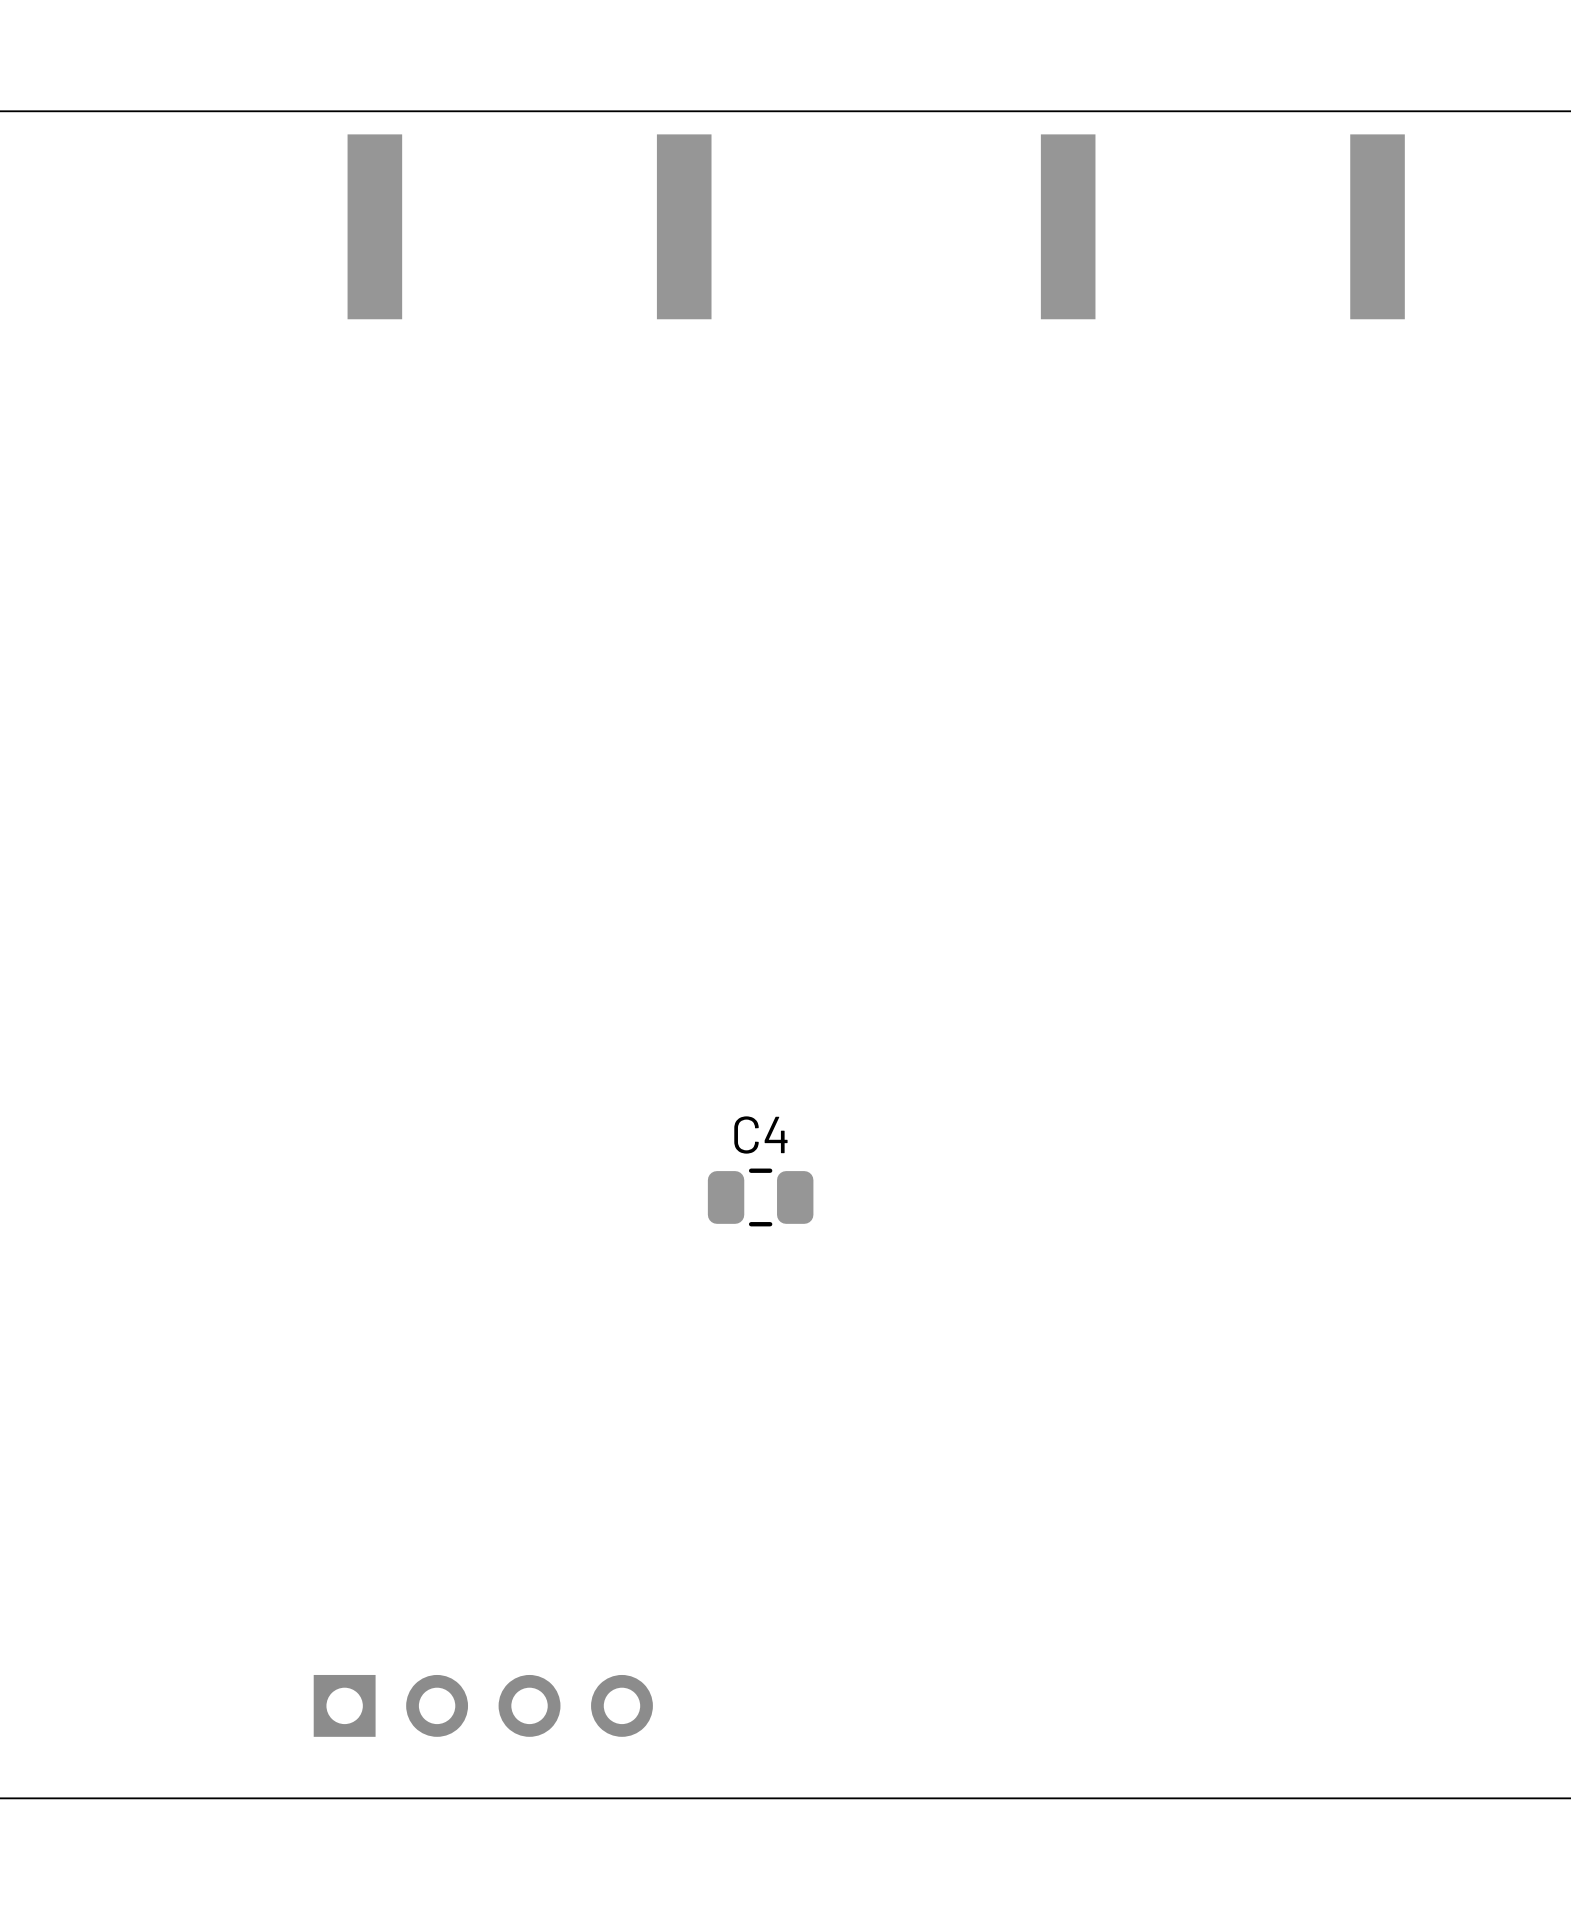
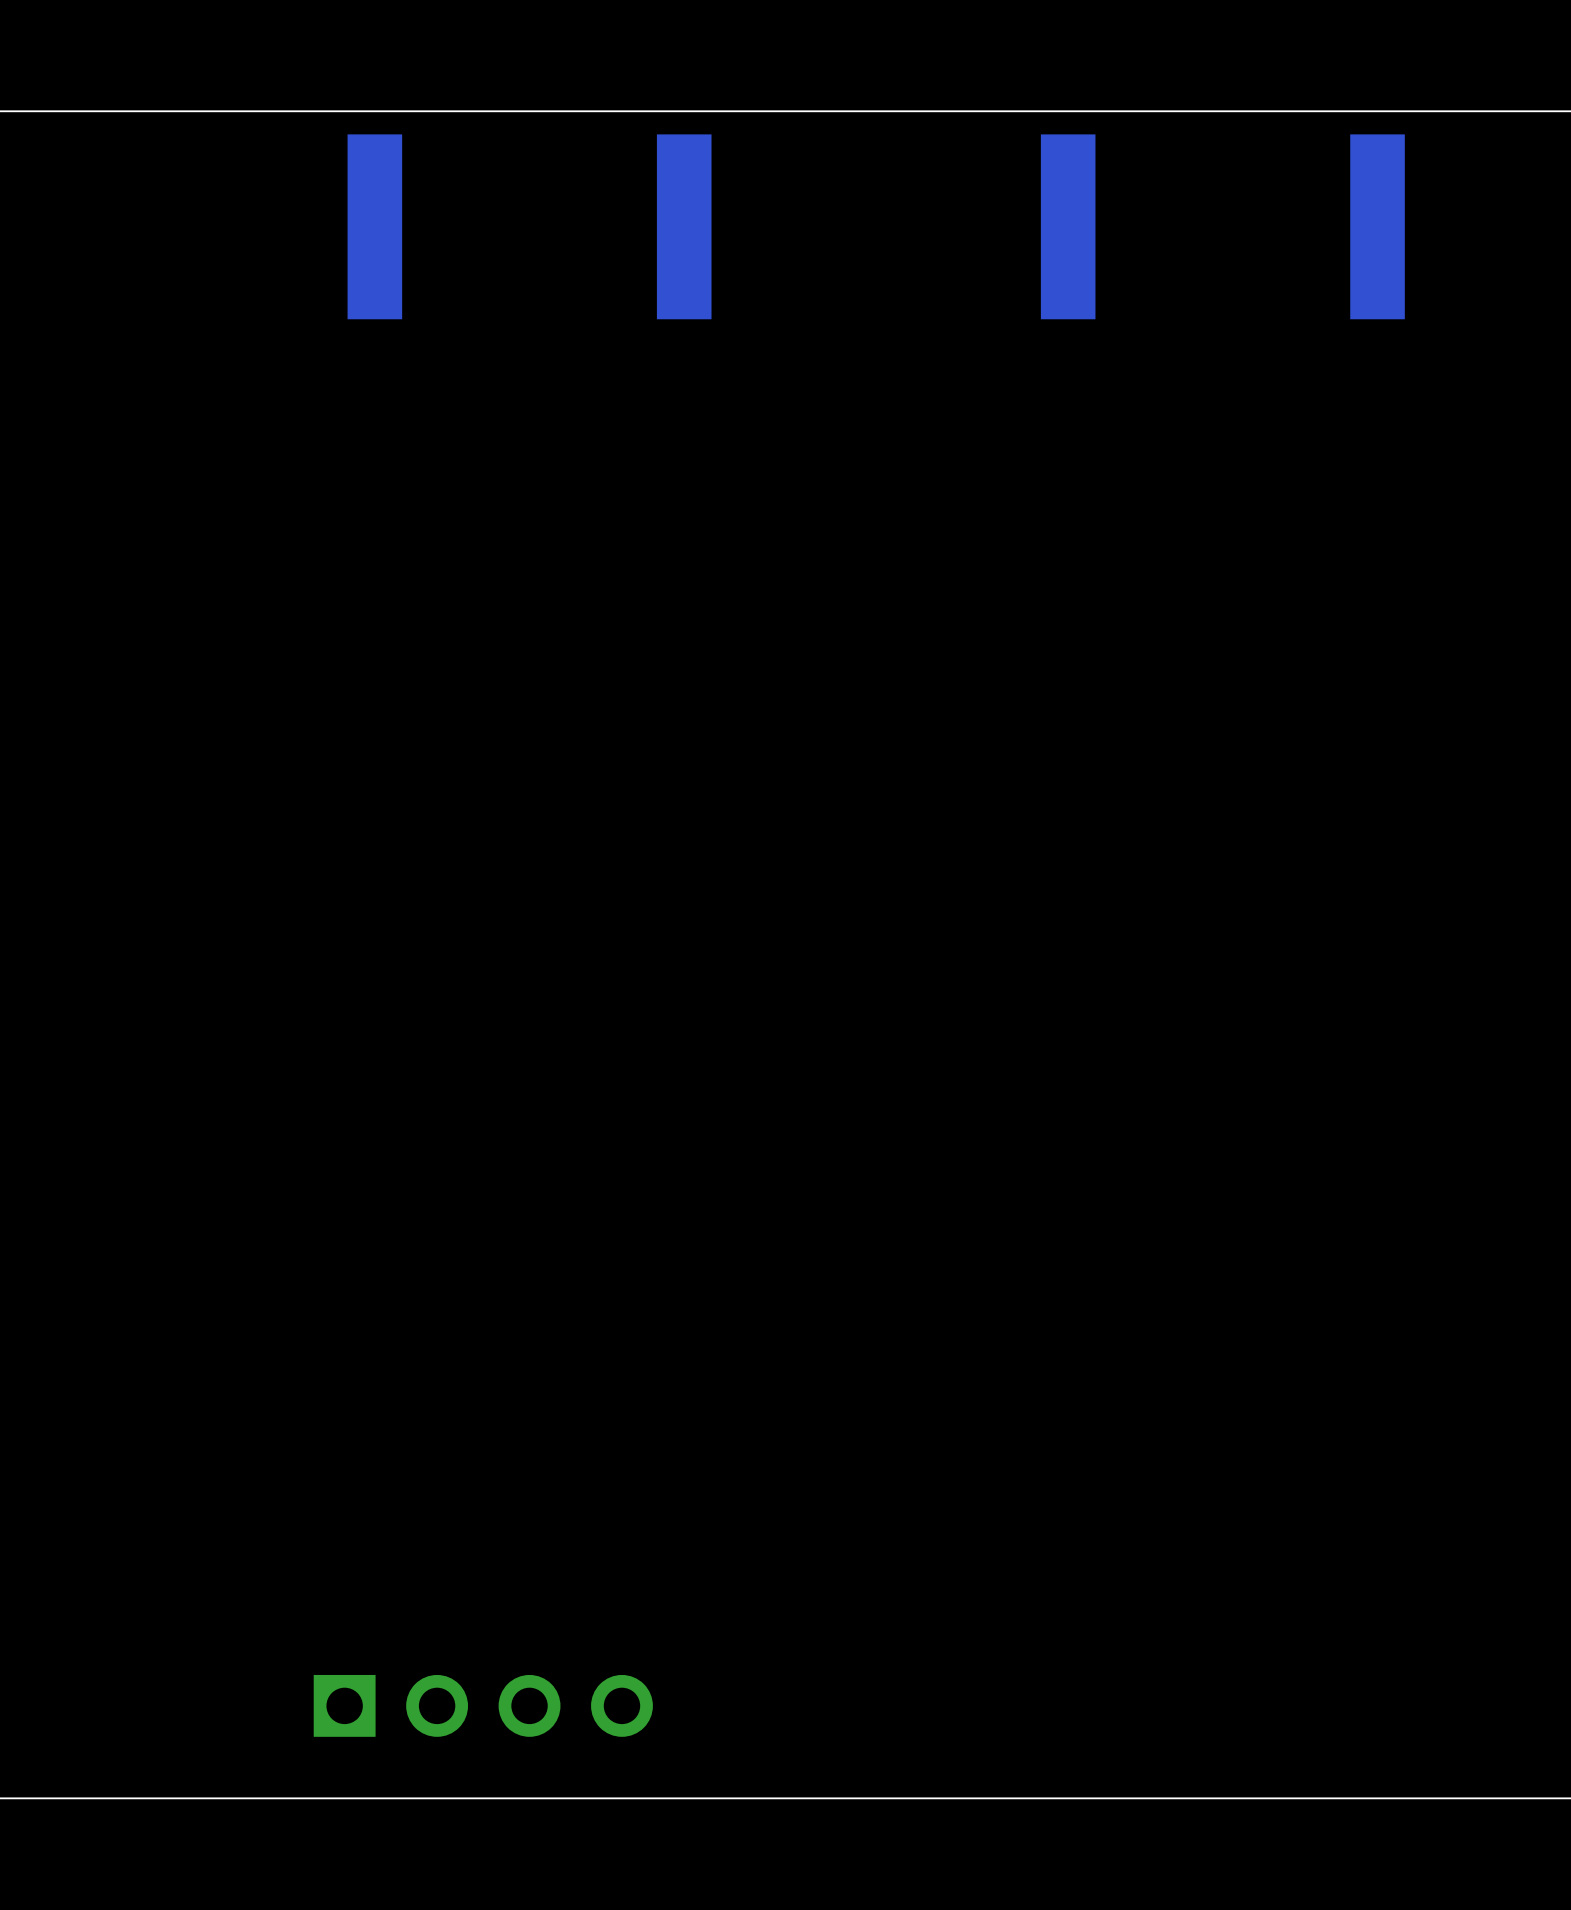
C4: (760, 1197) -> none

